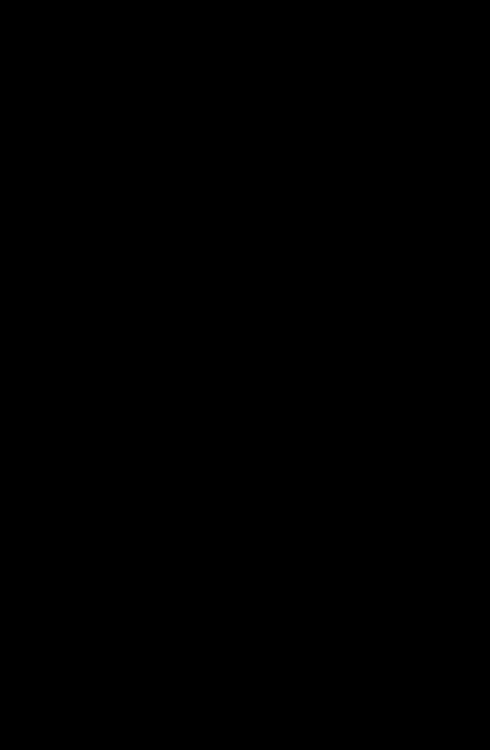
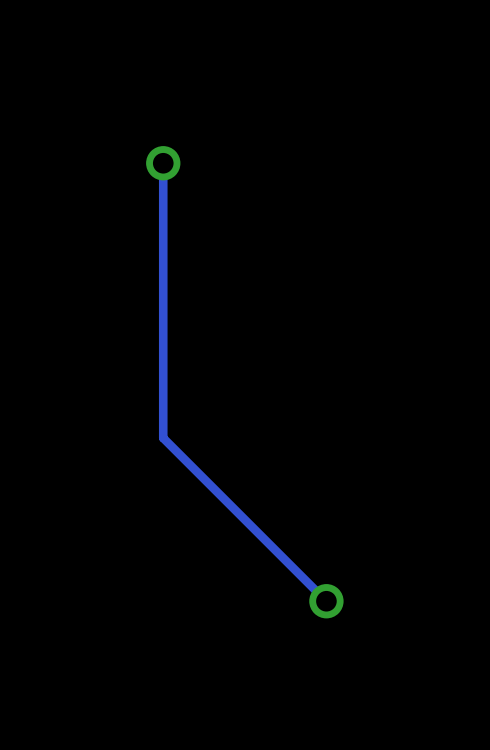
track: none -> (163, 163) (163, 438) (326, 601)
via: none -> (163, 163)
via: none -> (326, 601)

